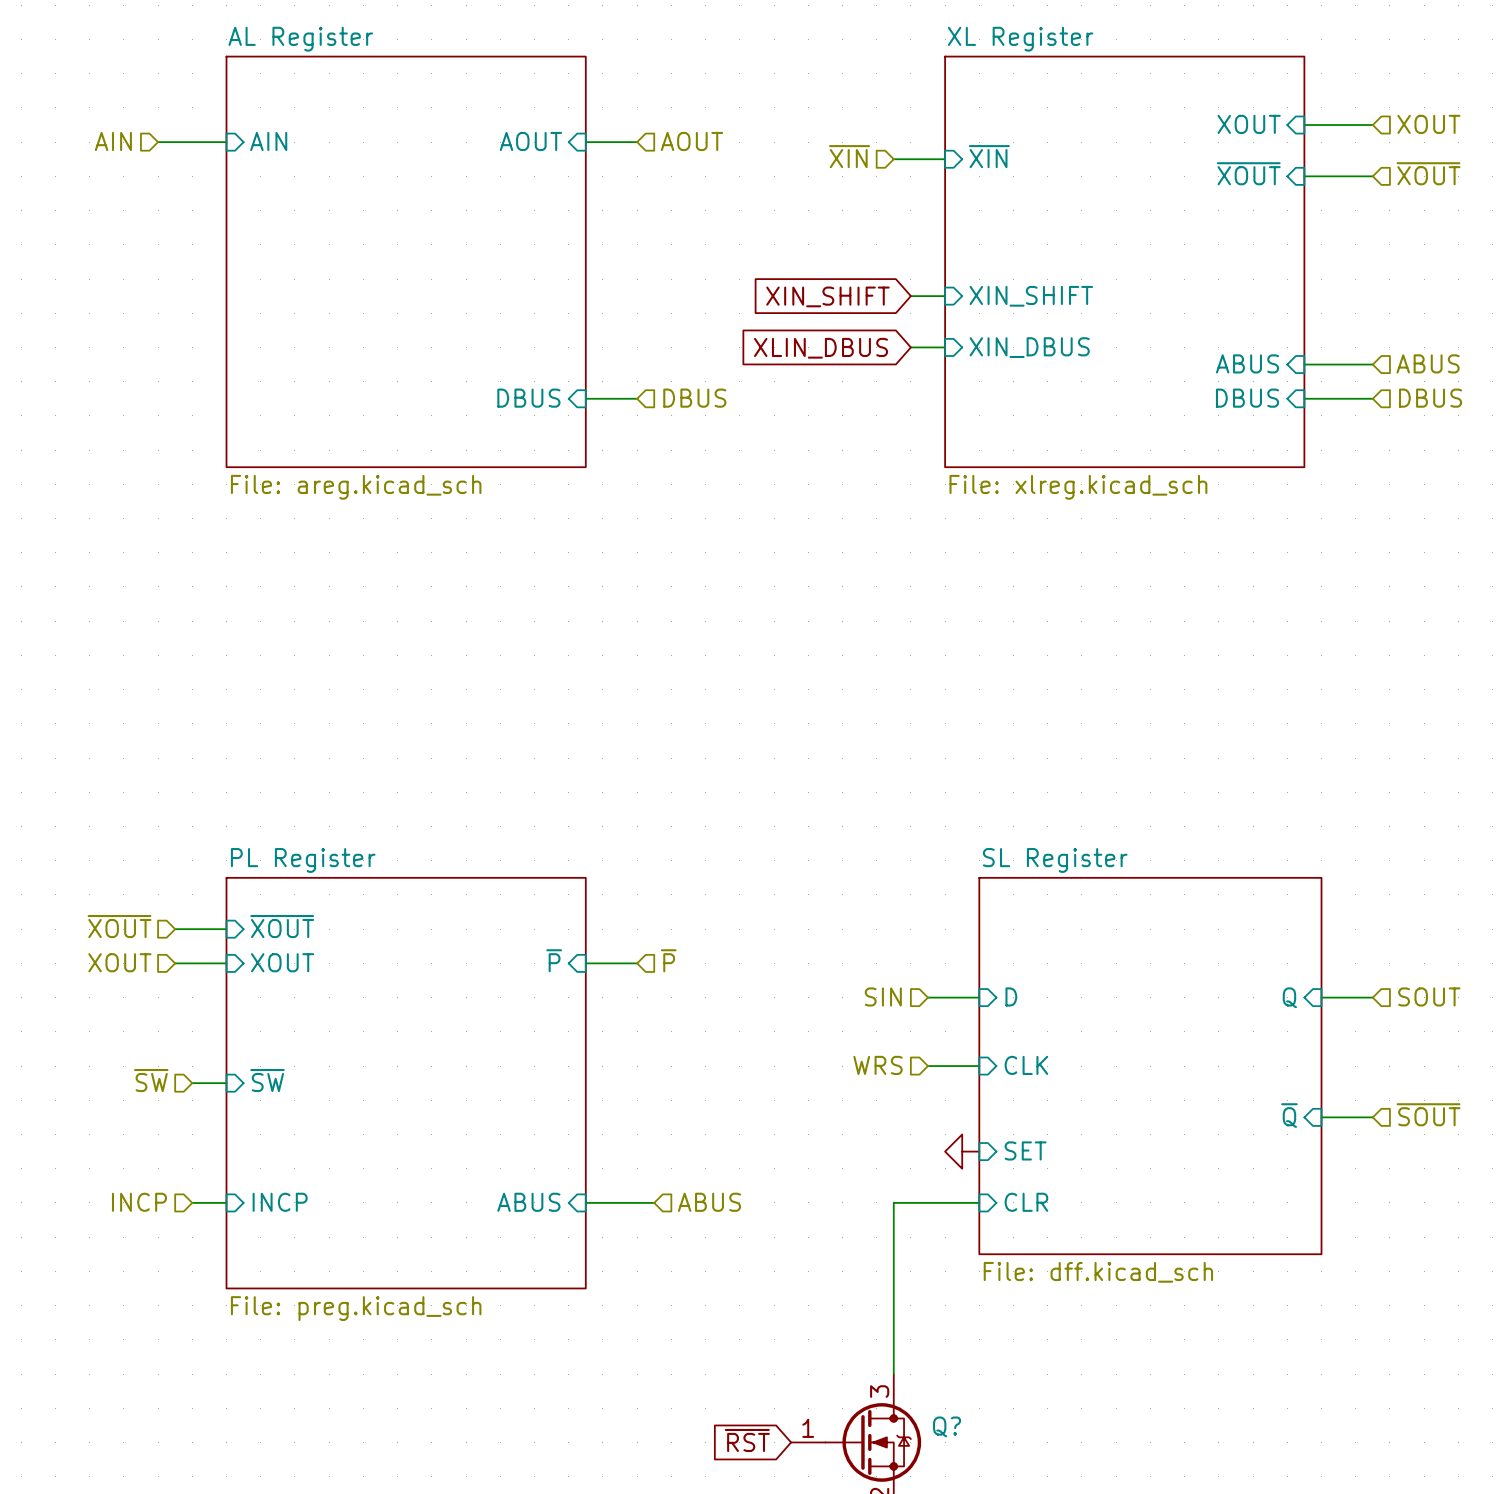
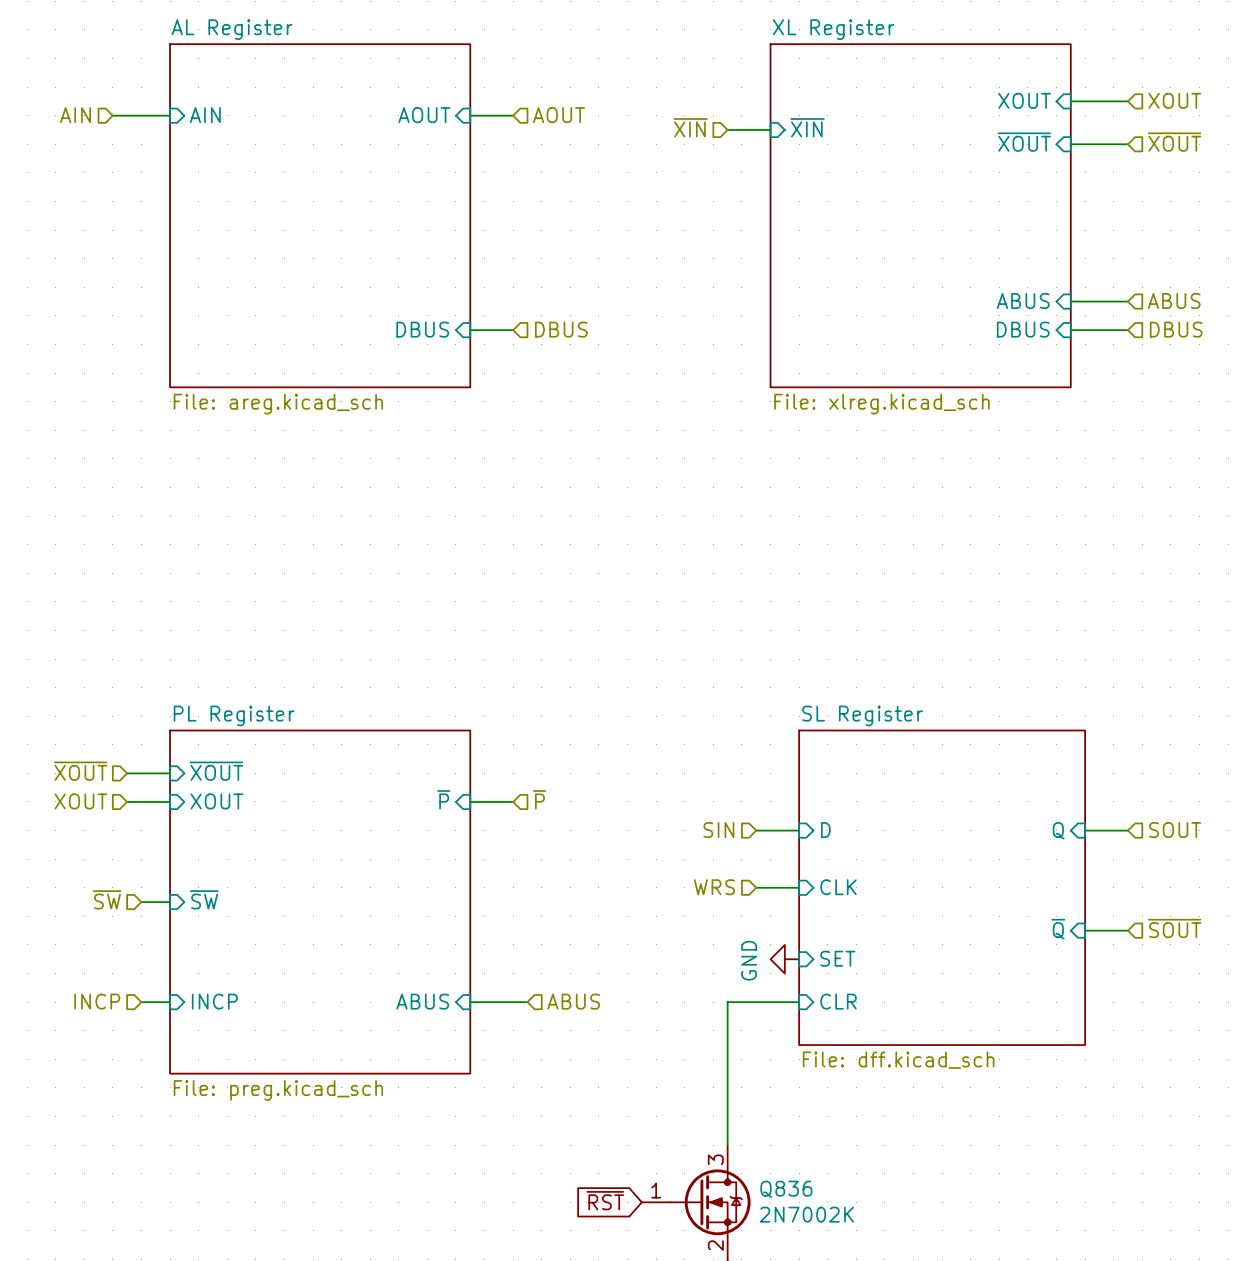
global label: XIN_SHIFT (827, 296) -> none
wire: (910, 296) (945, 296) -> none
sheet pin: XIN_SHIFT (1031, 296) -> none
wire: (910, 347) (945, 347) -> none
sheet pin: XIN_DBUS (1029, 347) -> none
global label: XLIN_DBUS (821, 348) -> none
power symbol text: none -> GND (749, 960)
Q? name: Q? (947, 1426) -> Q836 (786, 1189)
Q? value: none -> 2N7002K (806, 1214)

